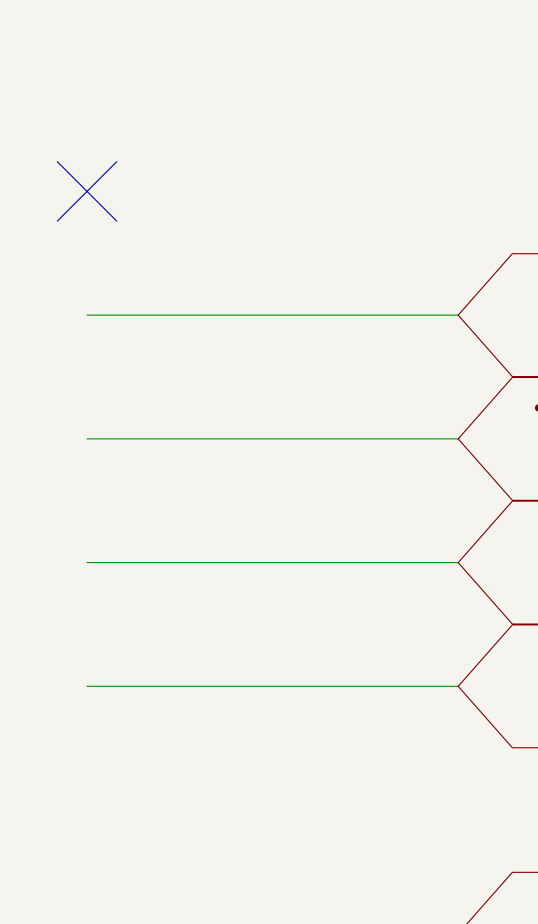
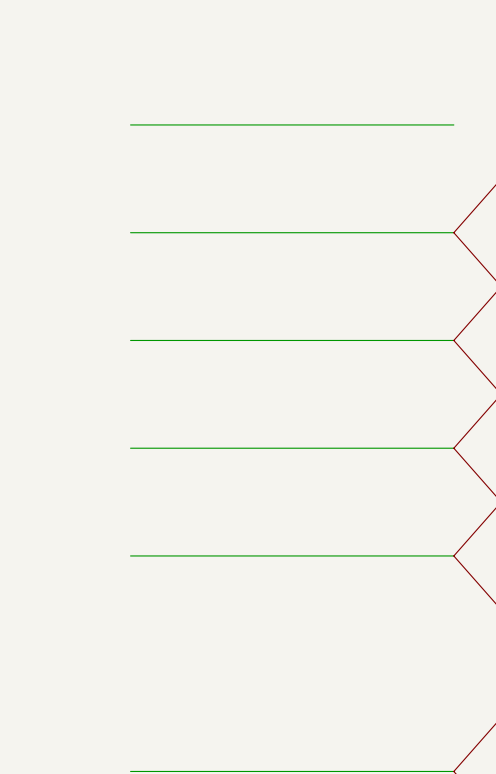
wire: none -> (130, 124) (453, 124)
no-connect mark: (87, 191) -> none

